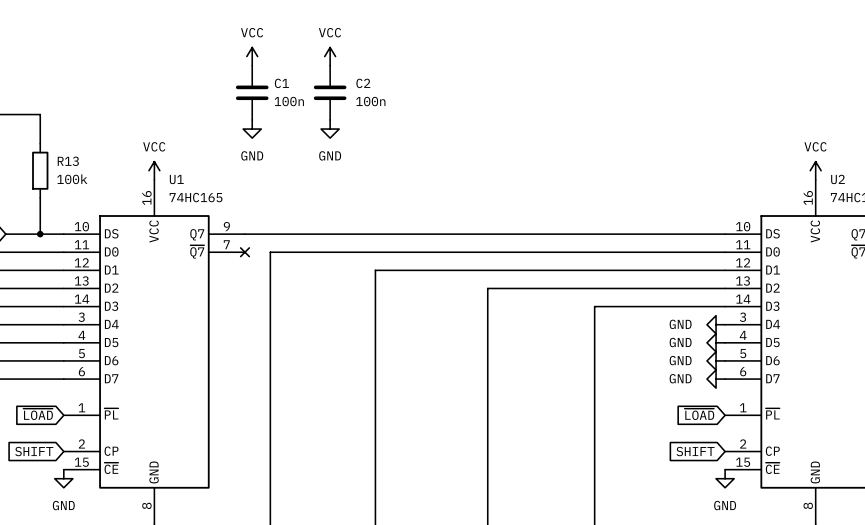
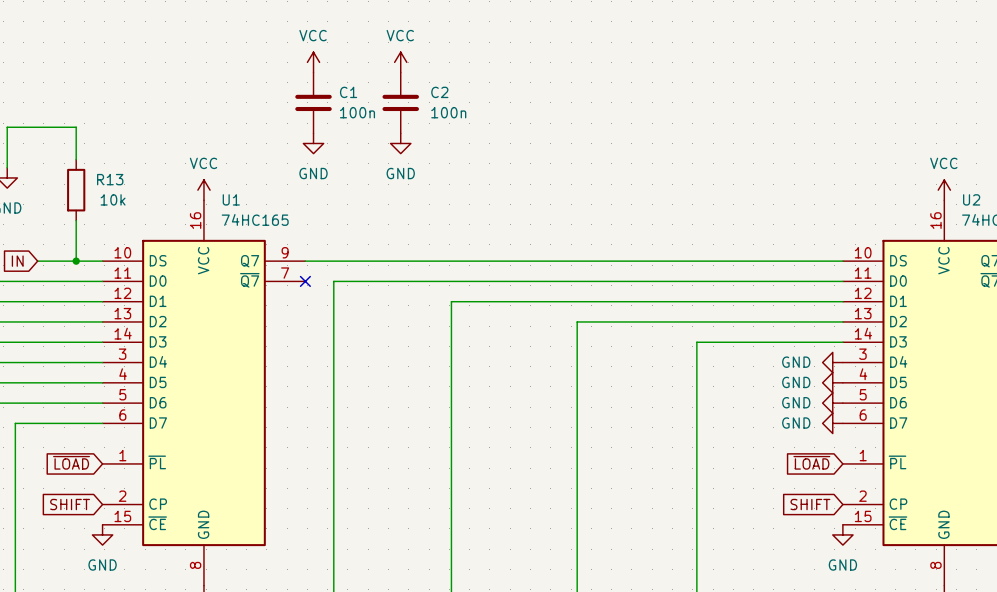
R13 value: 100k (72, 179) -> 10k (113, 199)

